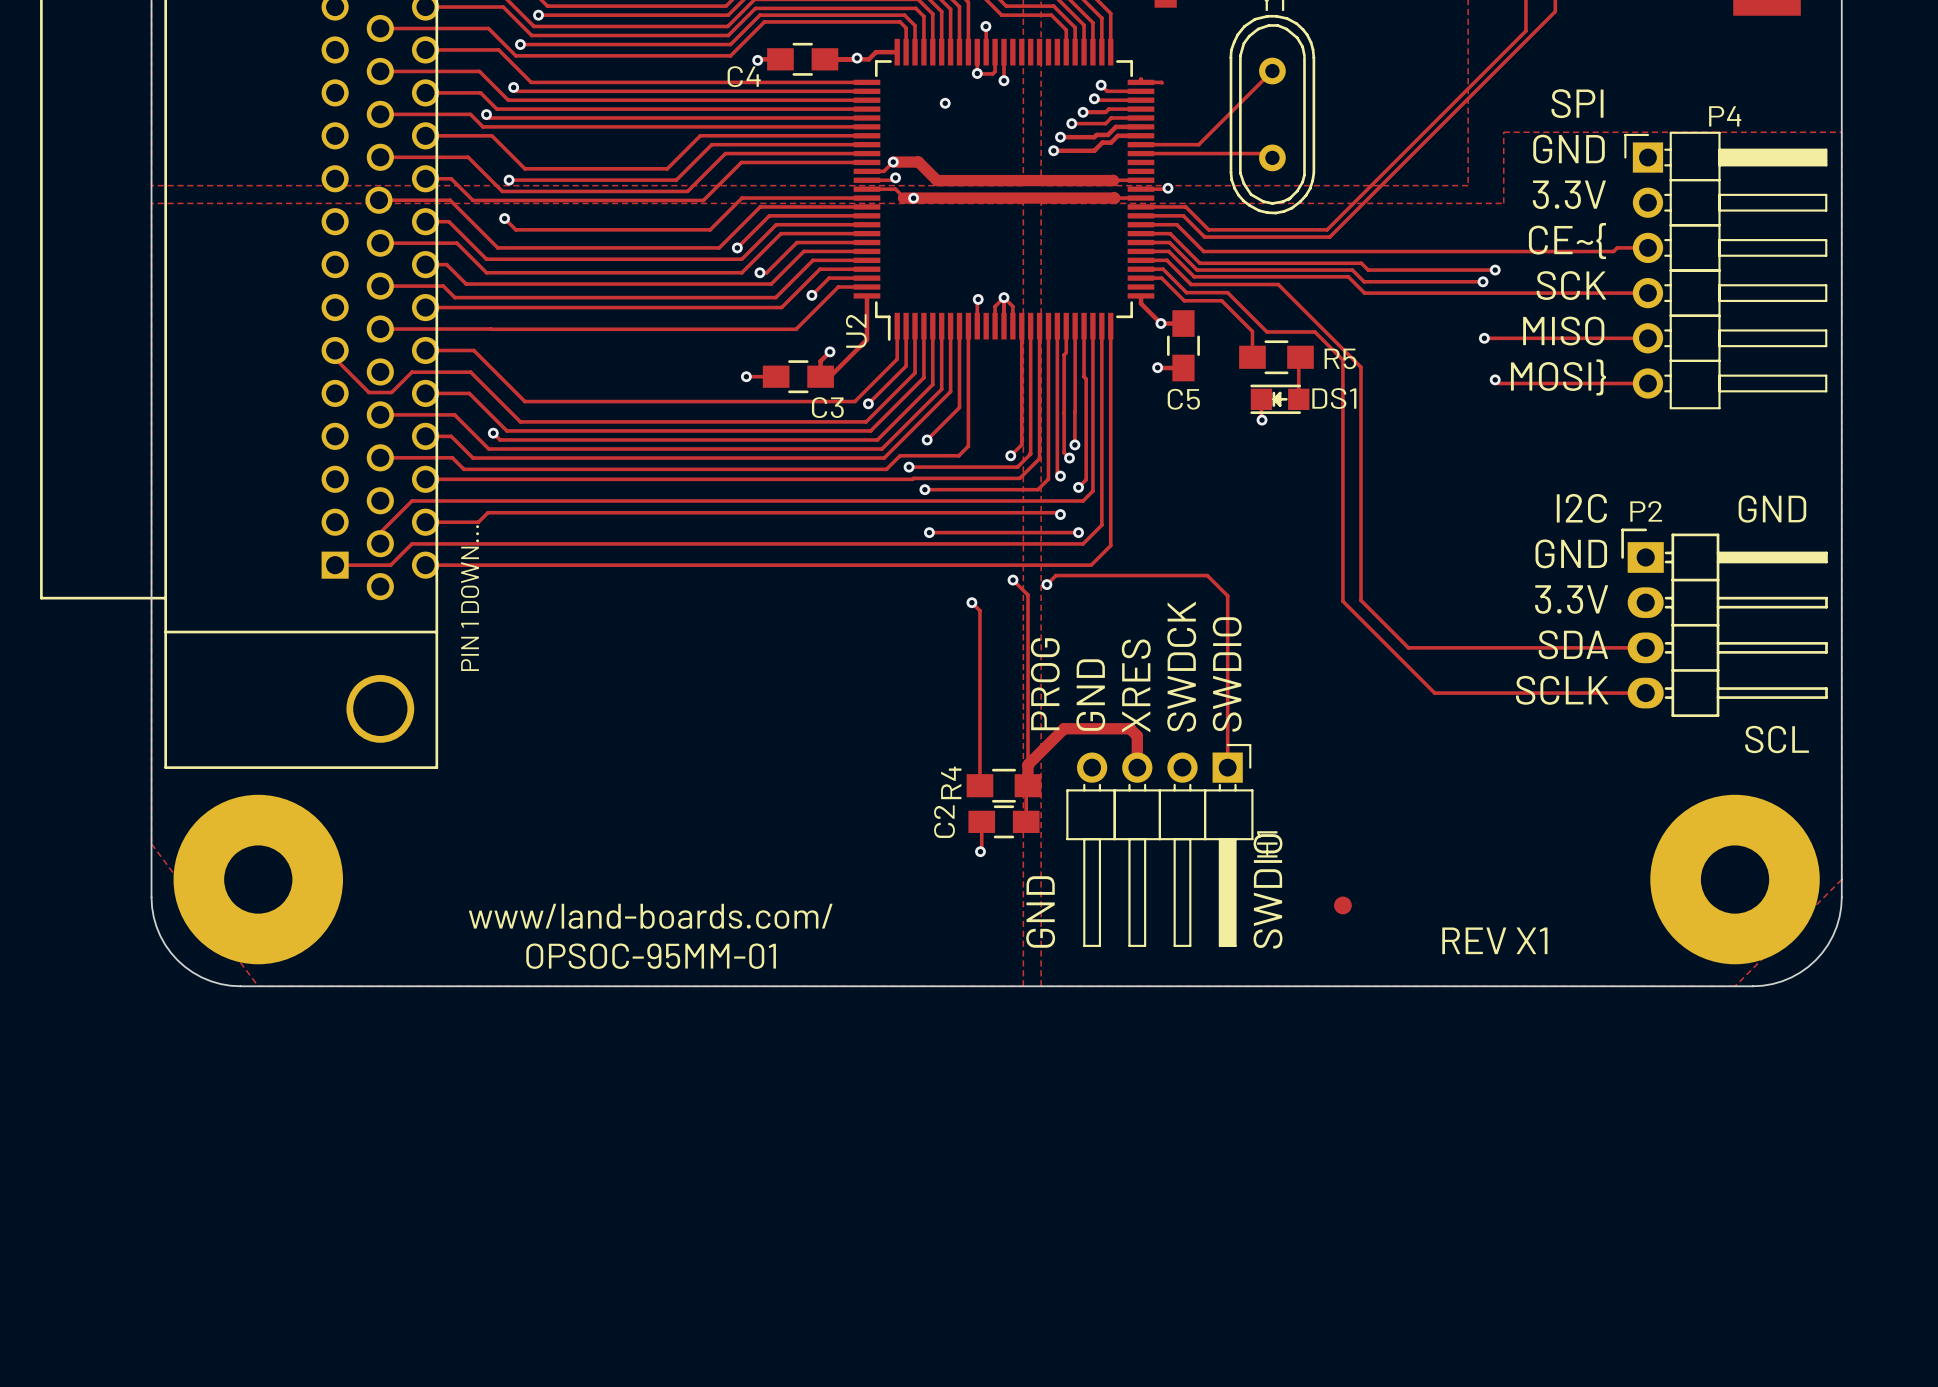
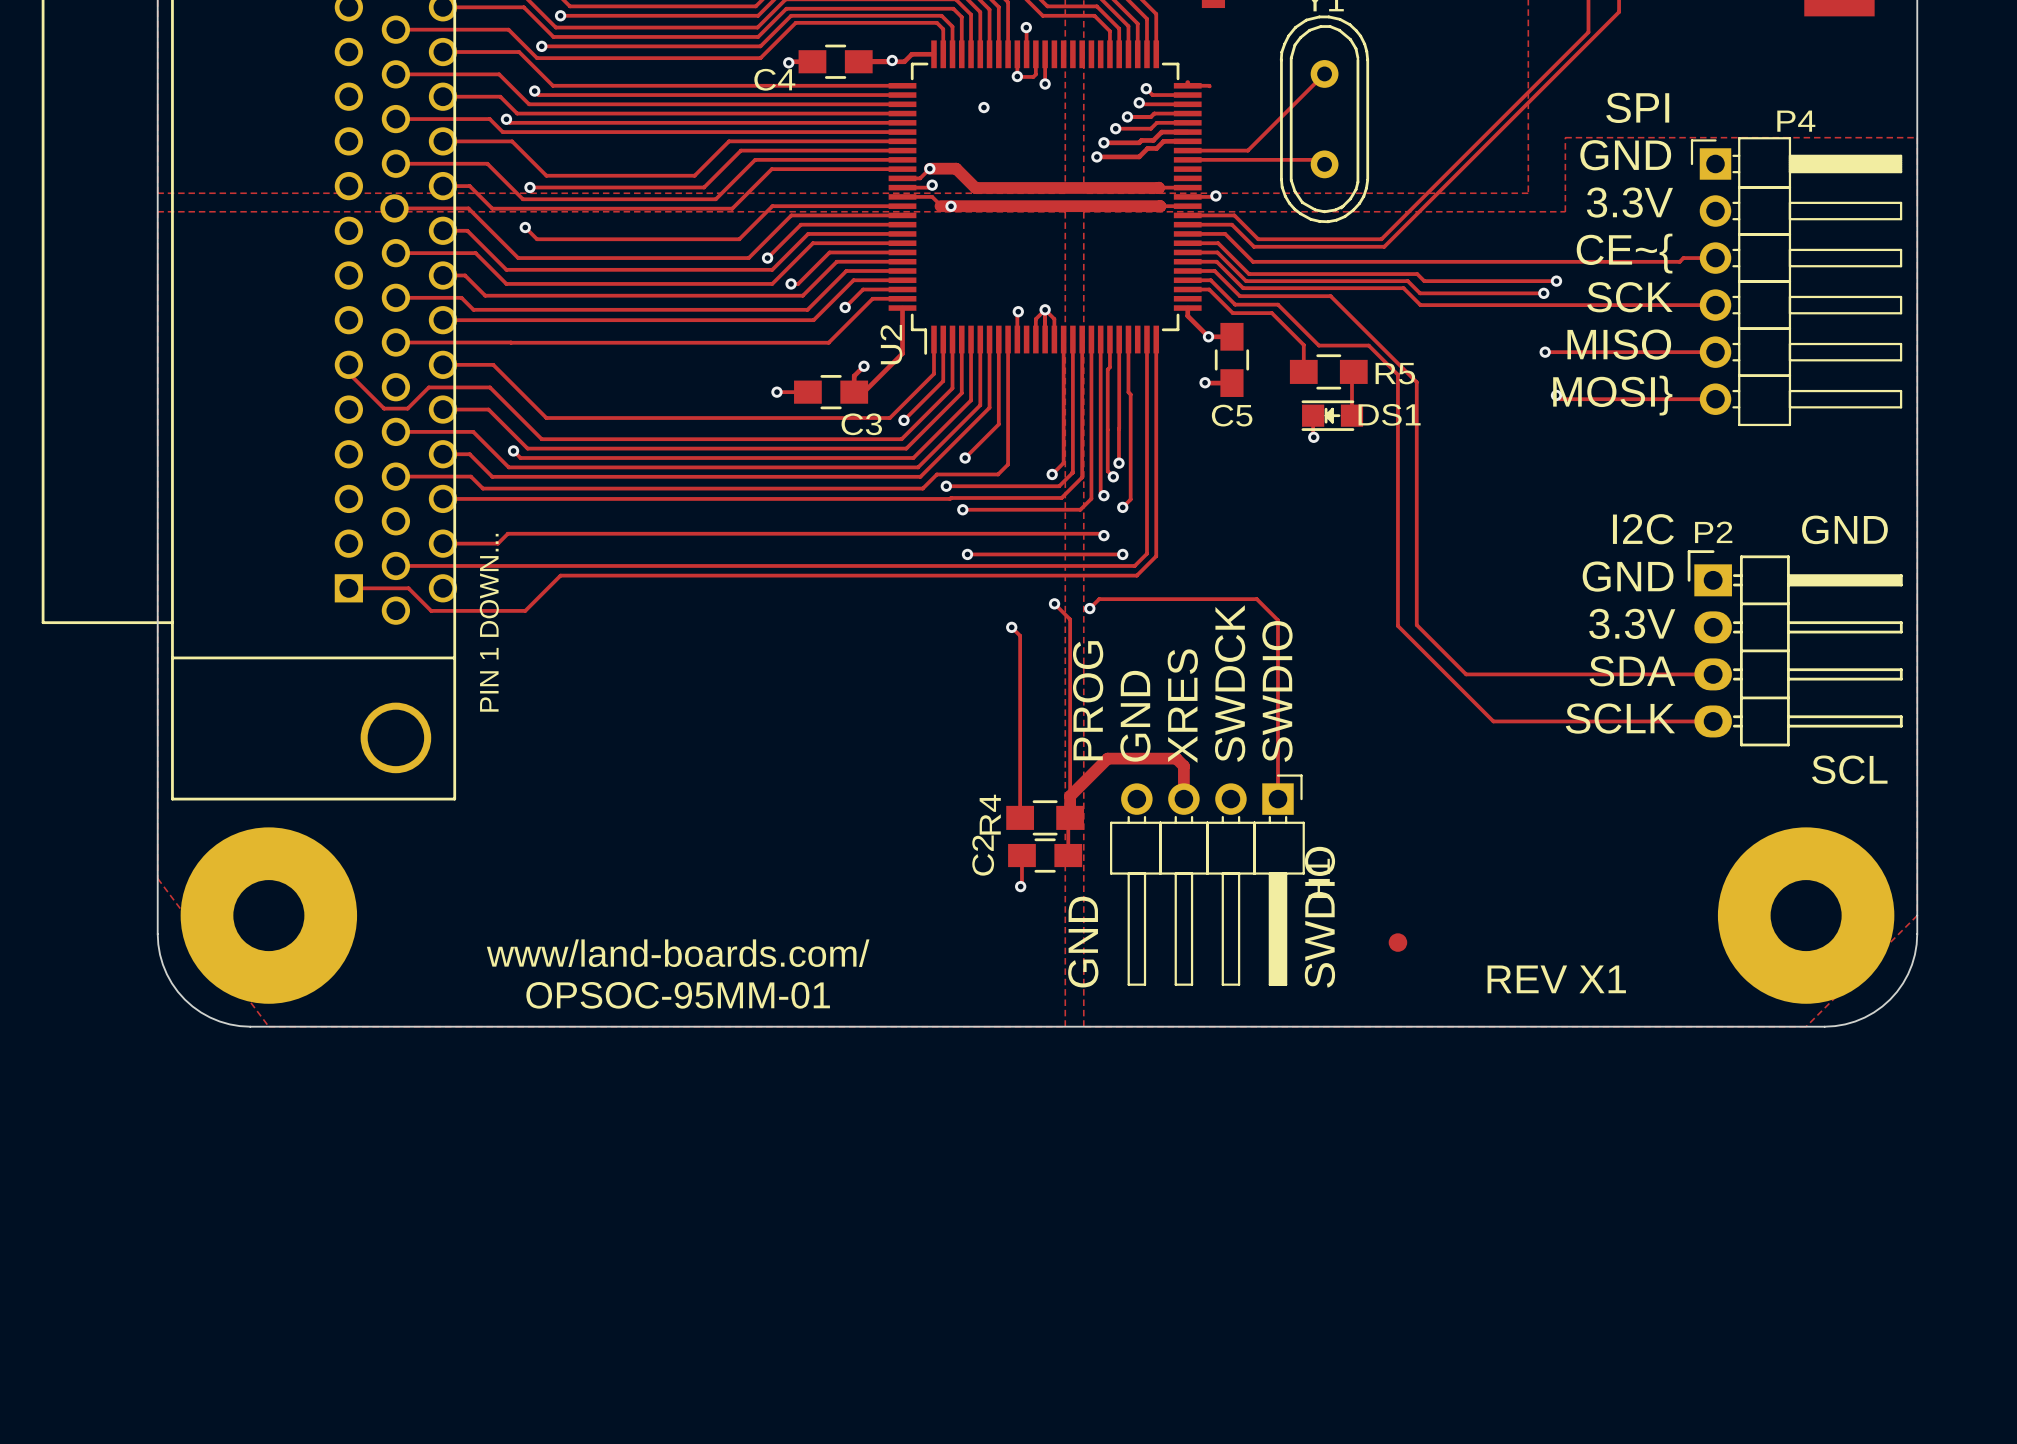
track: (1092, 326) (1092, 491) (1083, 500) (411, 500) (380, 532) -> none
track: (1101, 525) (1083, 543) (411, 543) (390, 565) -> (1156, 556) (1136, 575) (560, 575) (525, 610) (431, 610) (406, 588)
track: none -> (1146, 546) (1146, 553) (1134, 565) (395, 565)
track: (1110, 534) (1110, 545) (1091, 565) (425, 565) -> none

